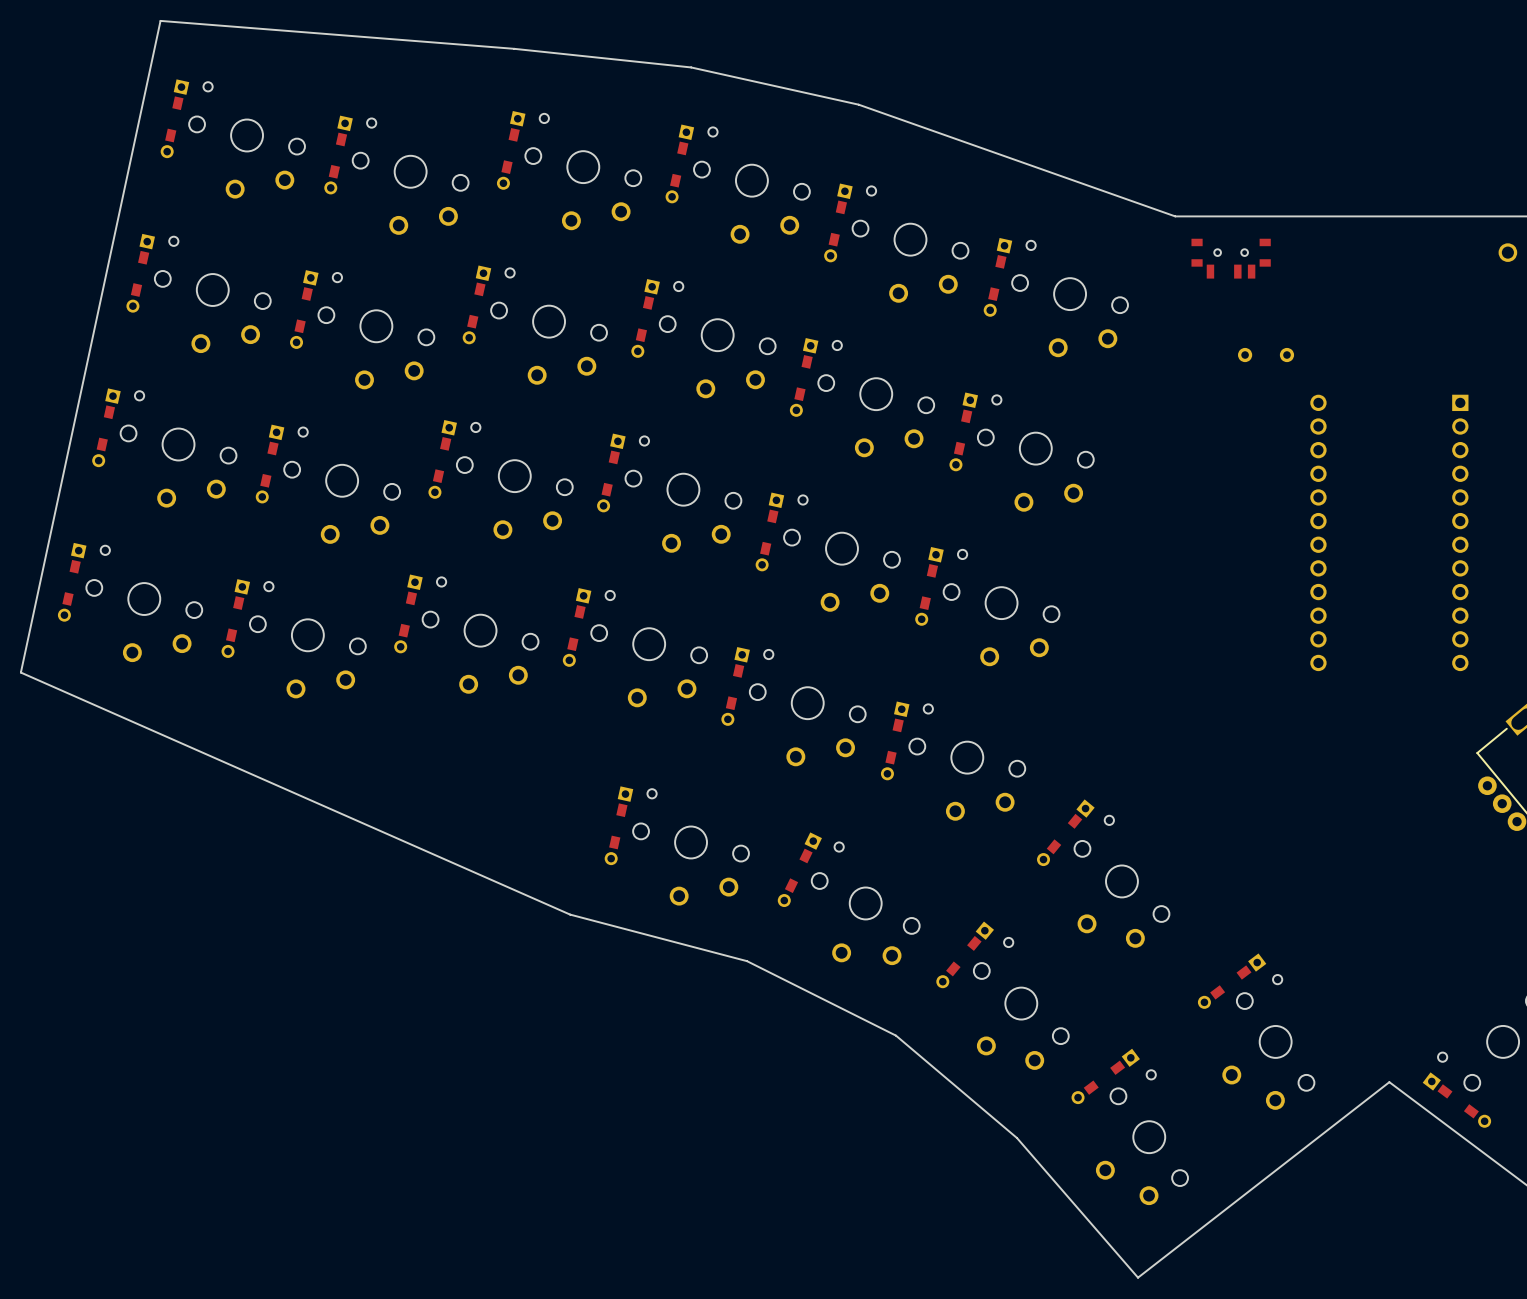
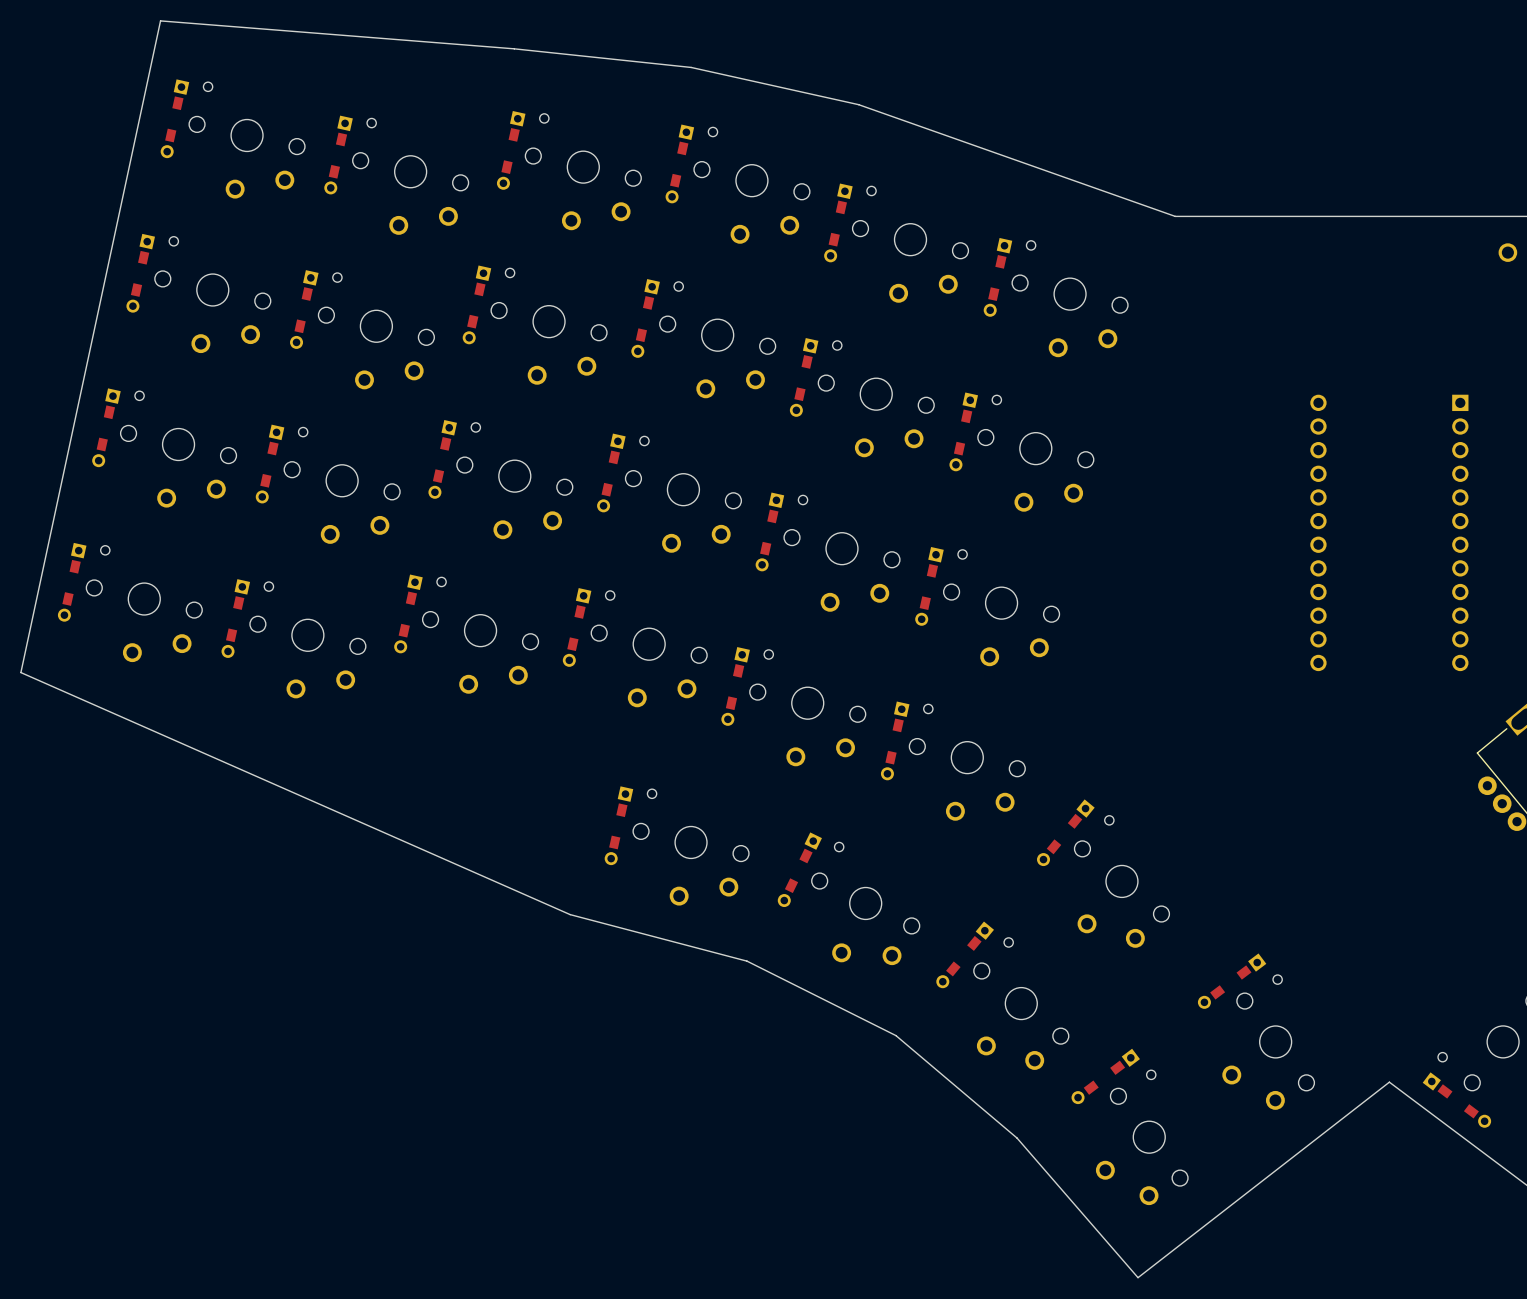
part: (1231, 258) -> none
part: (1245, 355) -> none
part: (1286, 355) -> none

